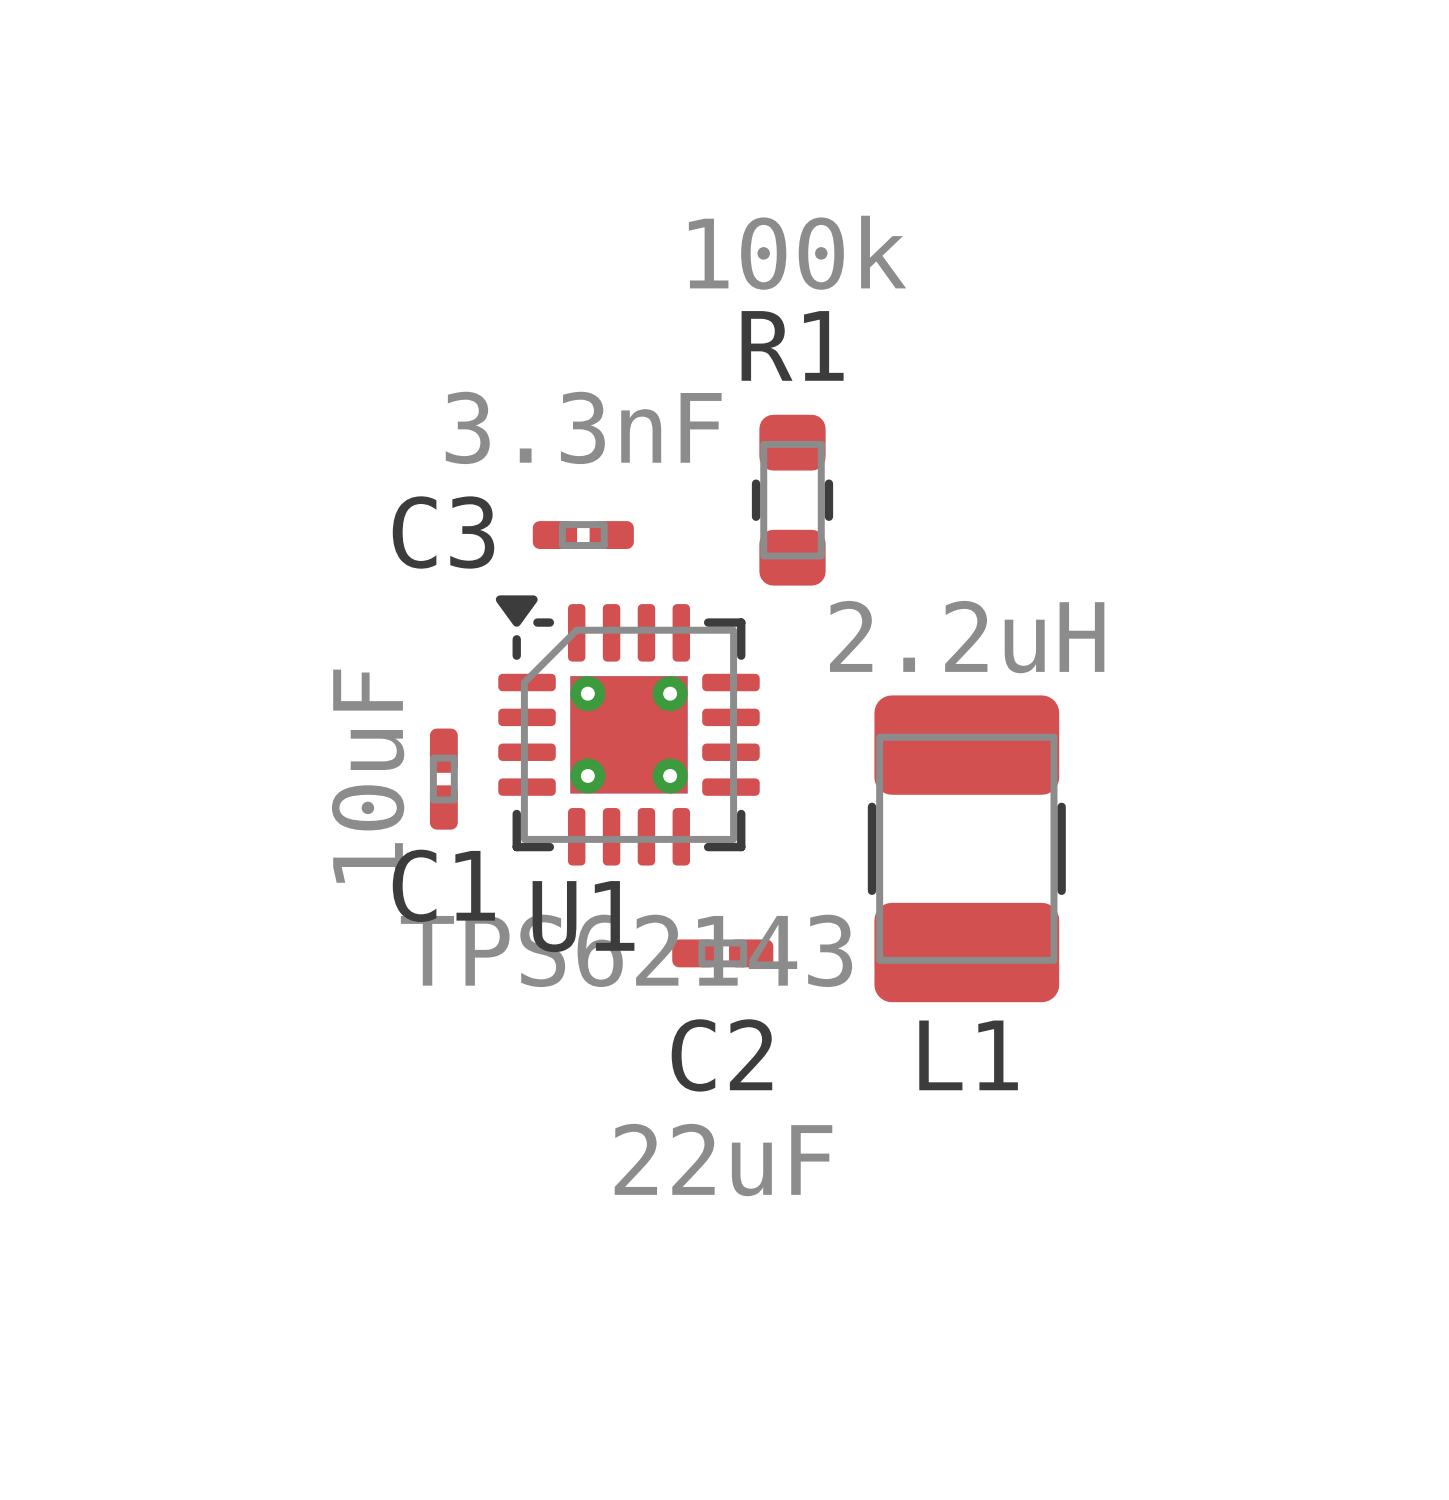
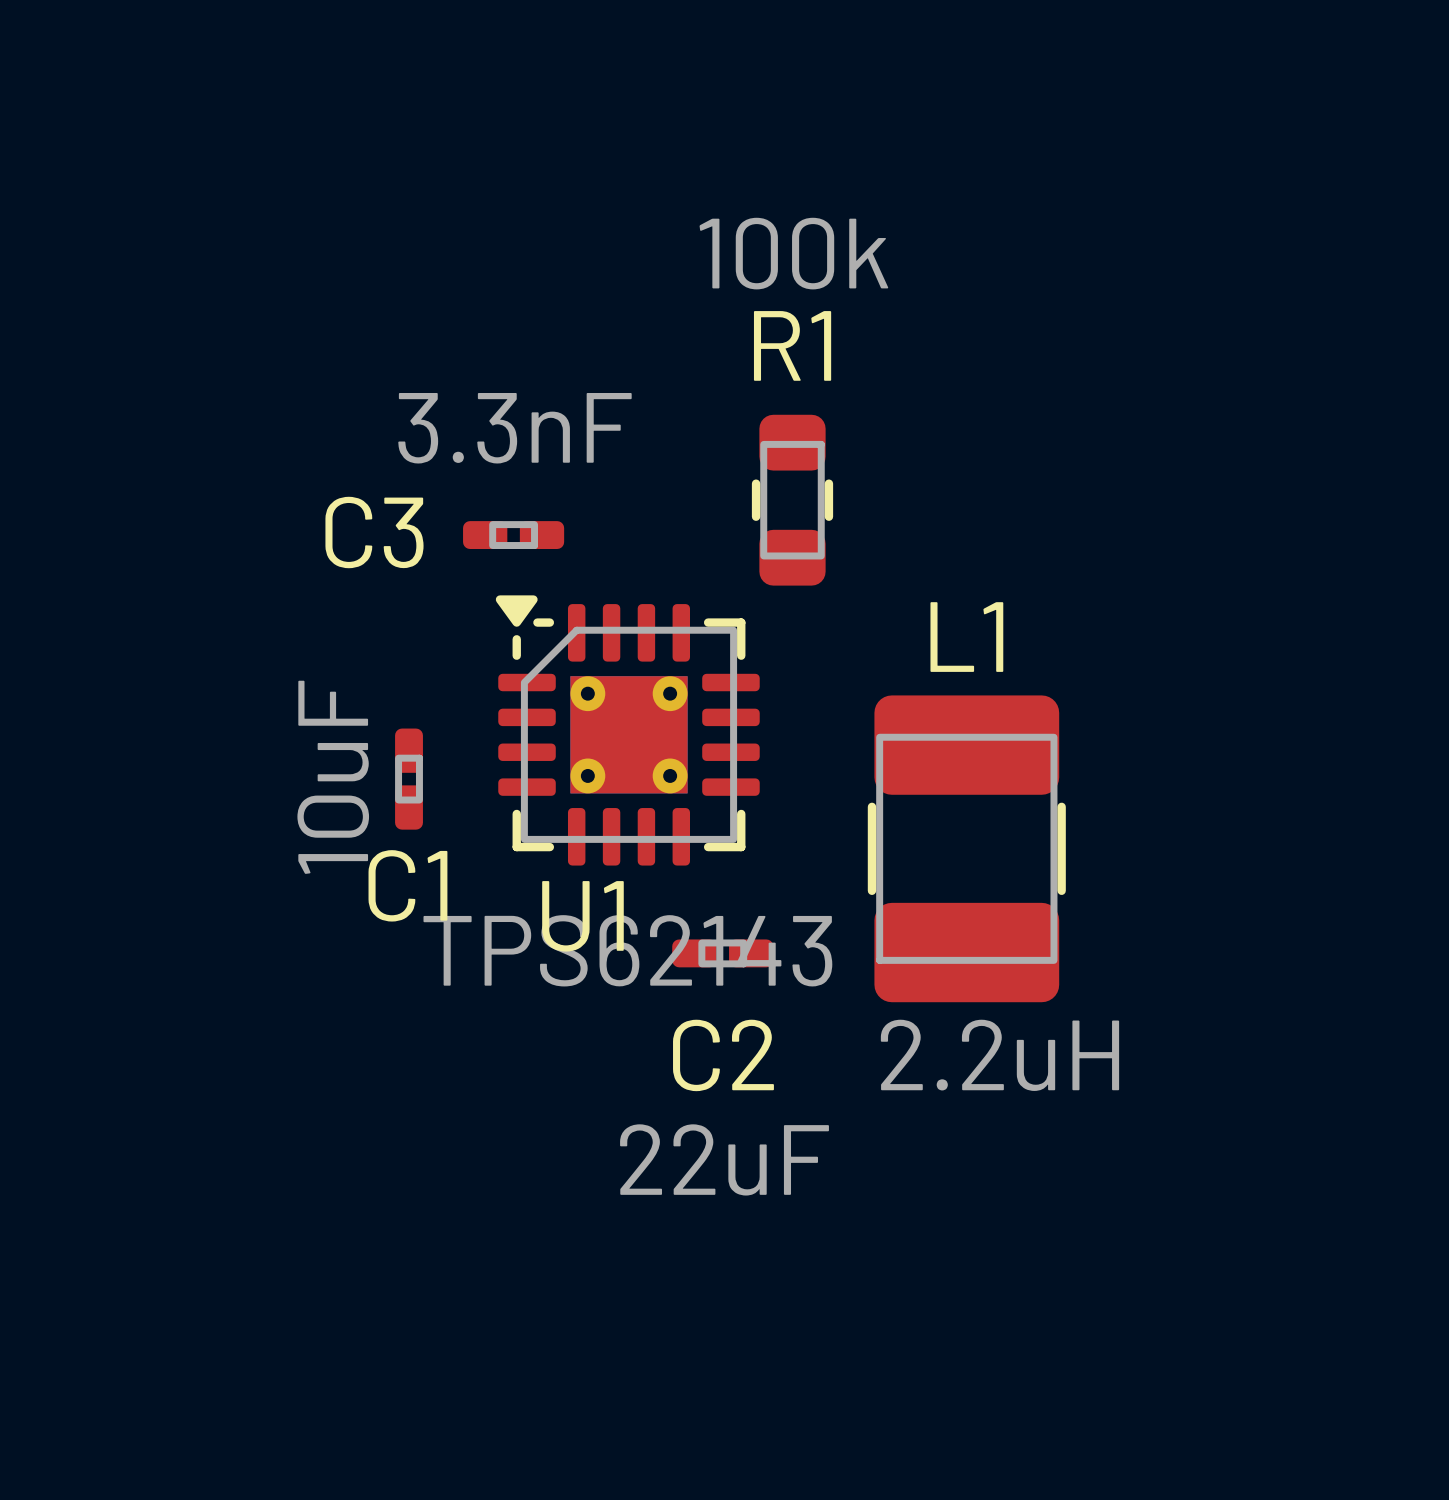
C3 position: (583, 535) -> (513, 535)
L1 value position: 2.2uH (967, 637) -> 2.2uH (999, 1055)
C1 position: (443, 779) -> (409, 779)
L1 name position: L1 (968, 1055) -> L1 (966, 637)

